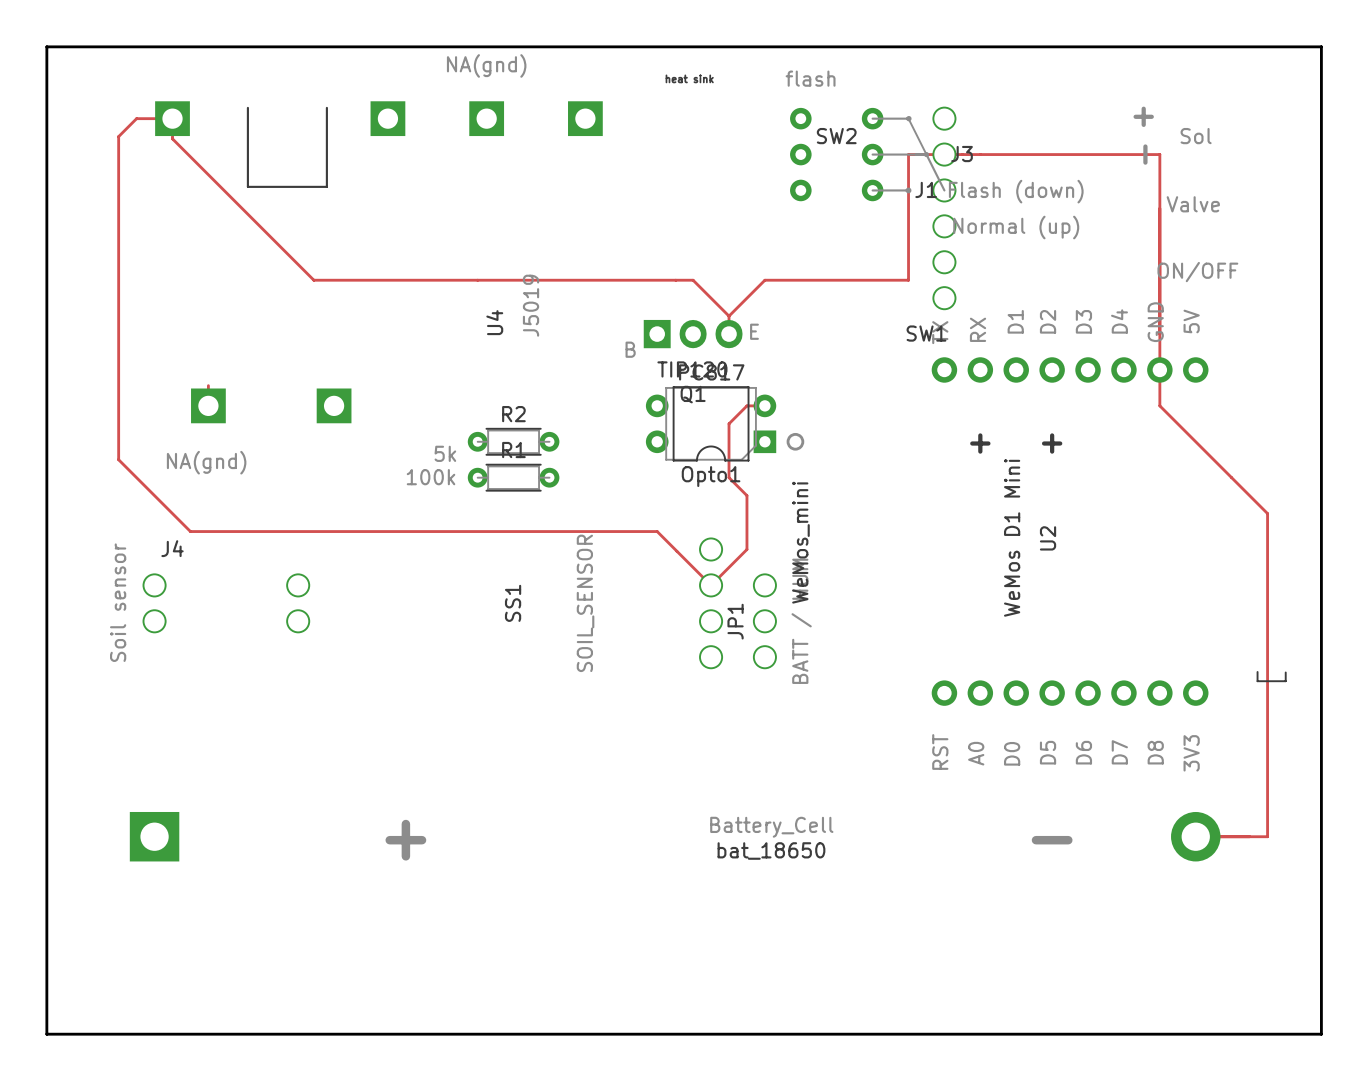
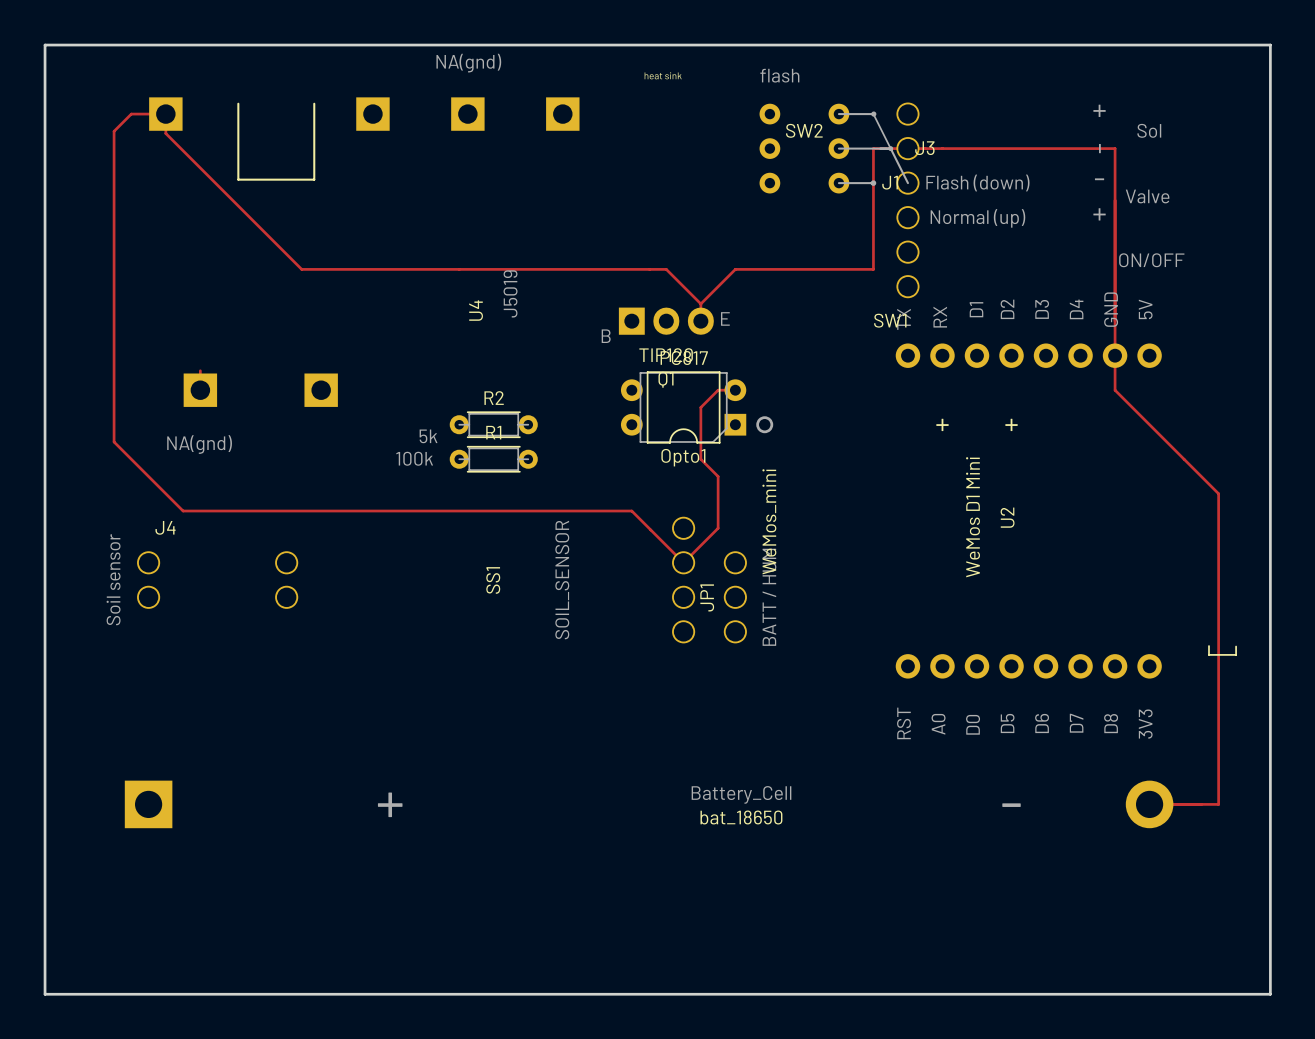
text: none -> - (1099, 179)
text: none -> + (1099, 214)

